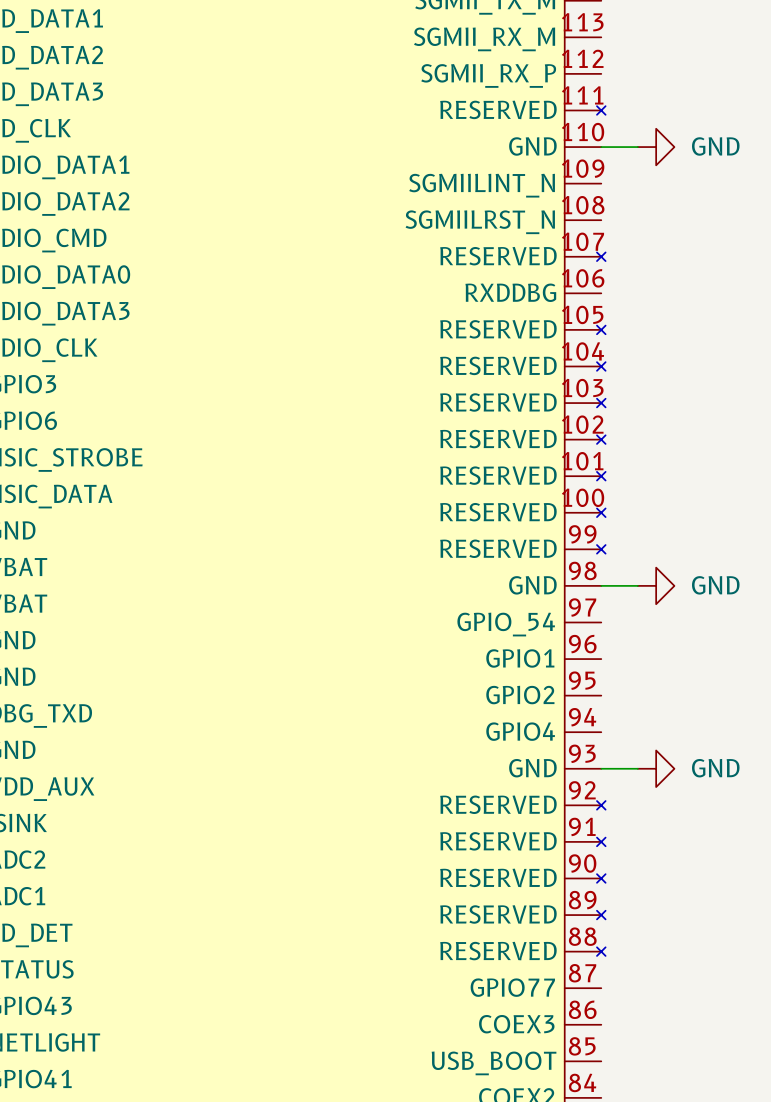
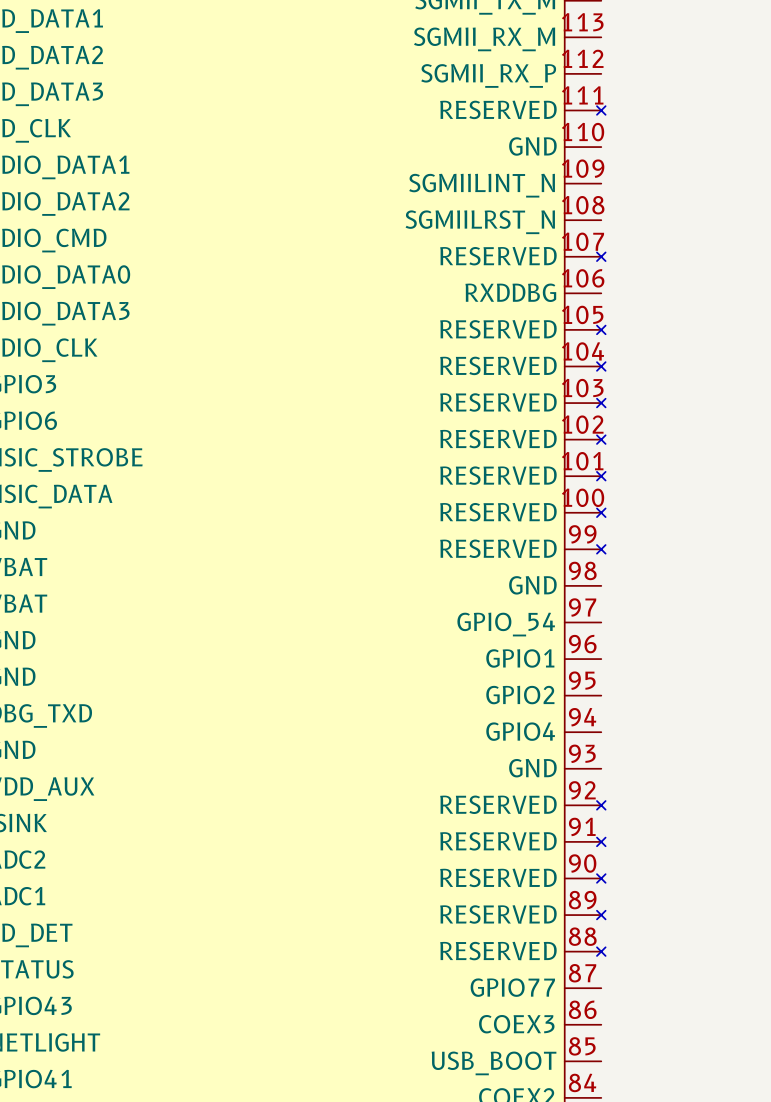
wire: (601, 147) (637, 147) -> none
power symbol: GND (656, 147) -> none
wire: (601, 585) (637, 585) -> none
power symbol: GND (656, 585) -> none
wire: (601, 768) (637, 768) -> none
power symbol: GND (656, 768) -> none

